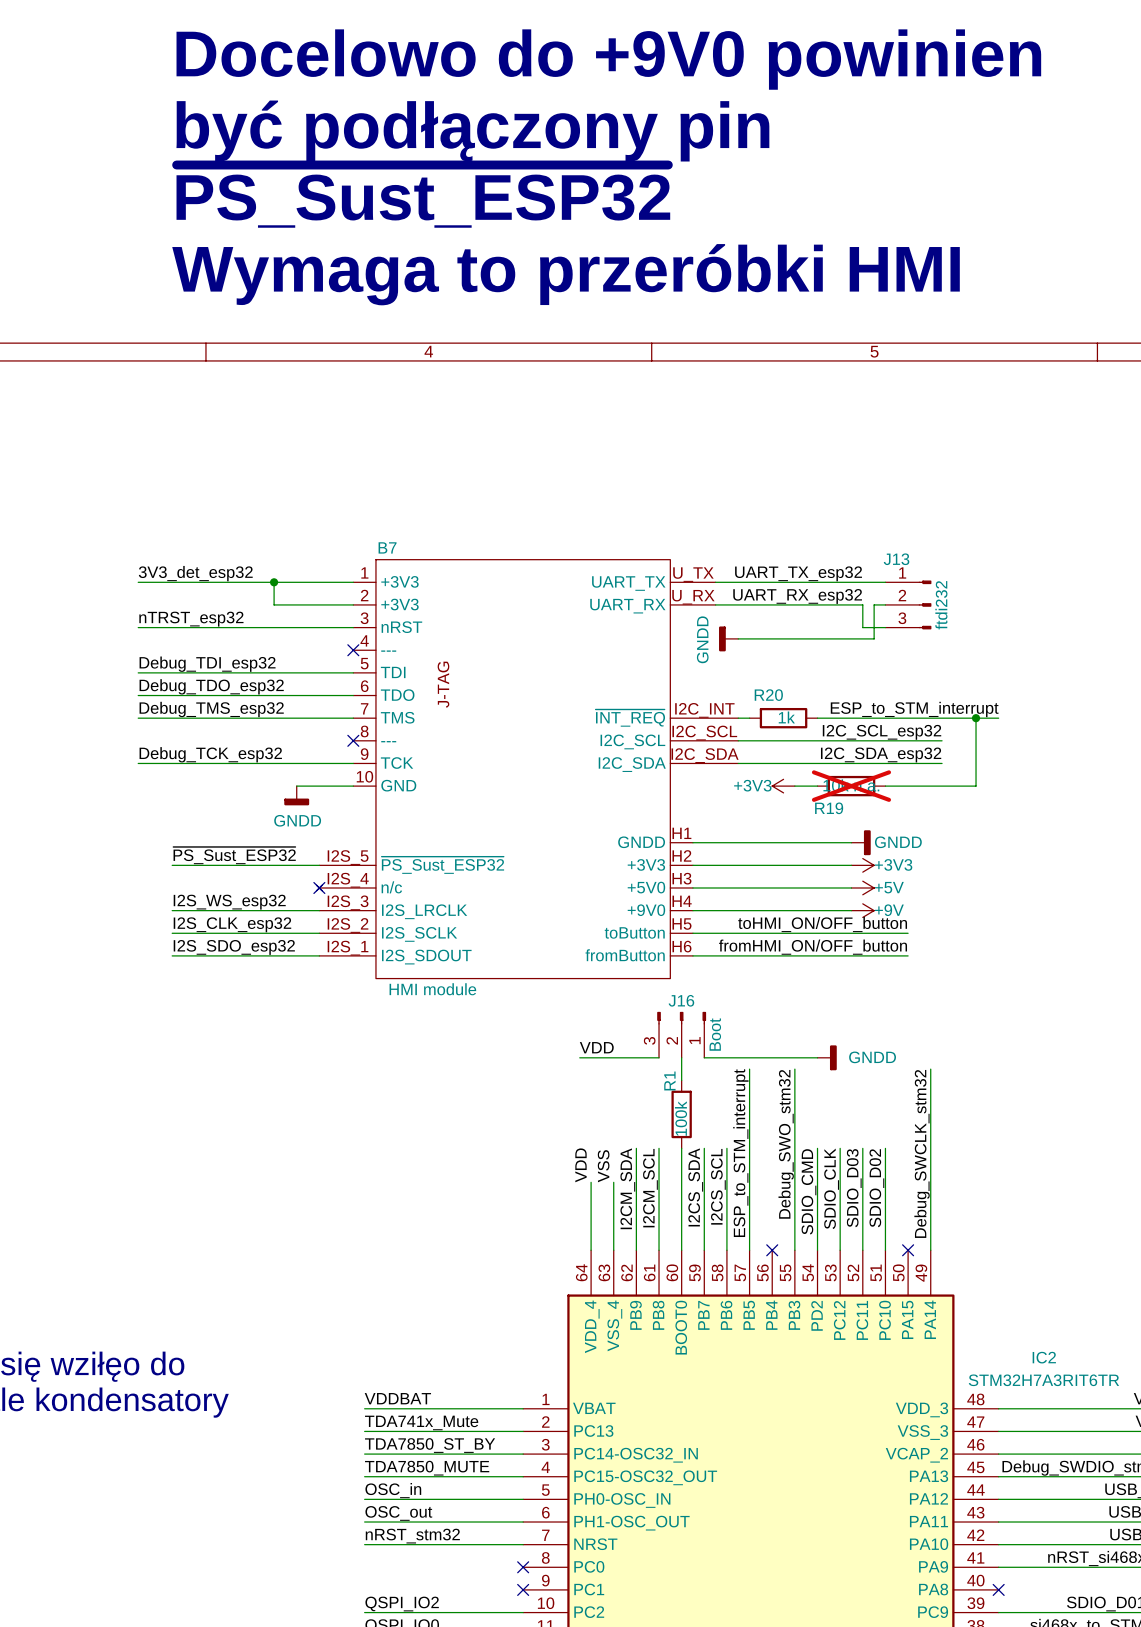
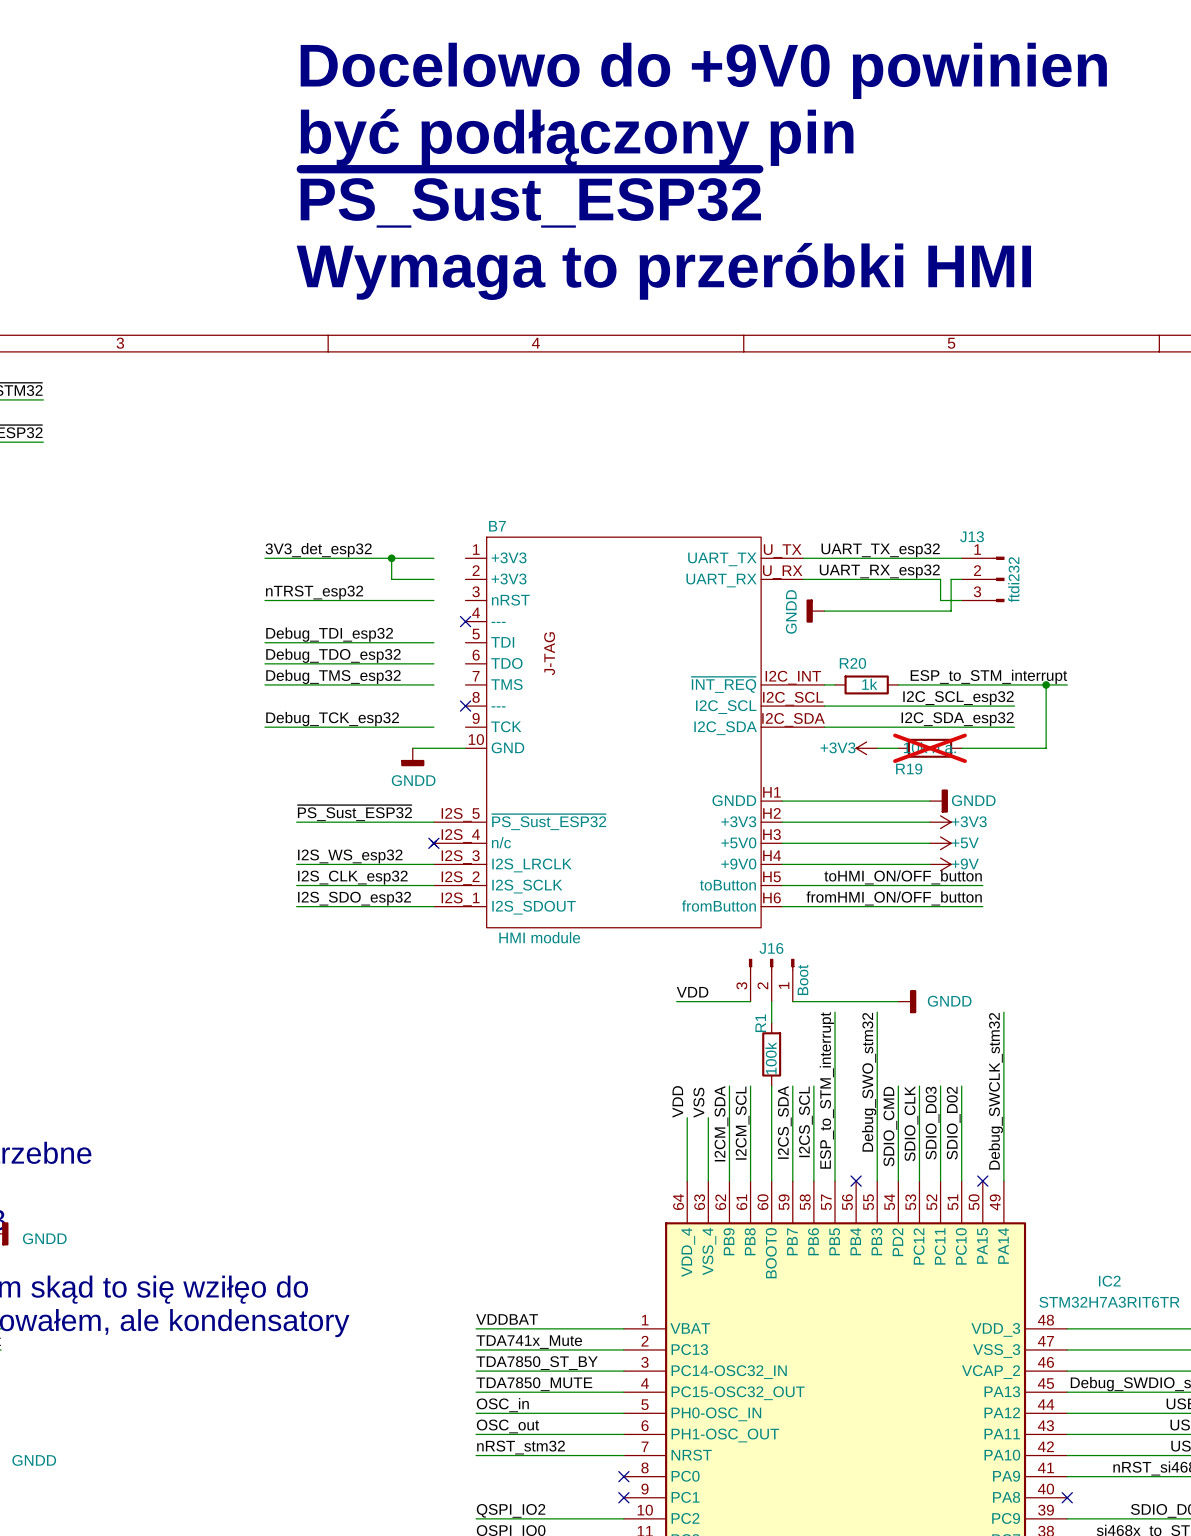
wire: (319, 582) (353, 582) -> none
wire: (319, 604) (353, 604) -> none
wire: (319, 627) (353, 627) -> none
wire: (319, 672) (353, 672) -> none
wire: (319, 695) (353, 695) -> none
wire: (319, 718) (353, 718) -> none
wire: (319, 763) (353, 763) -> none

